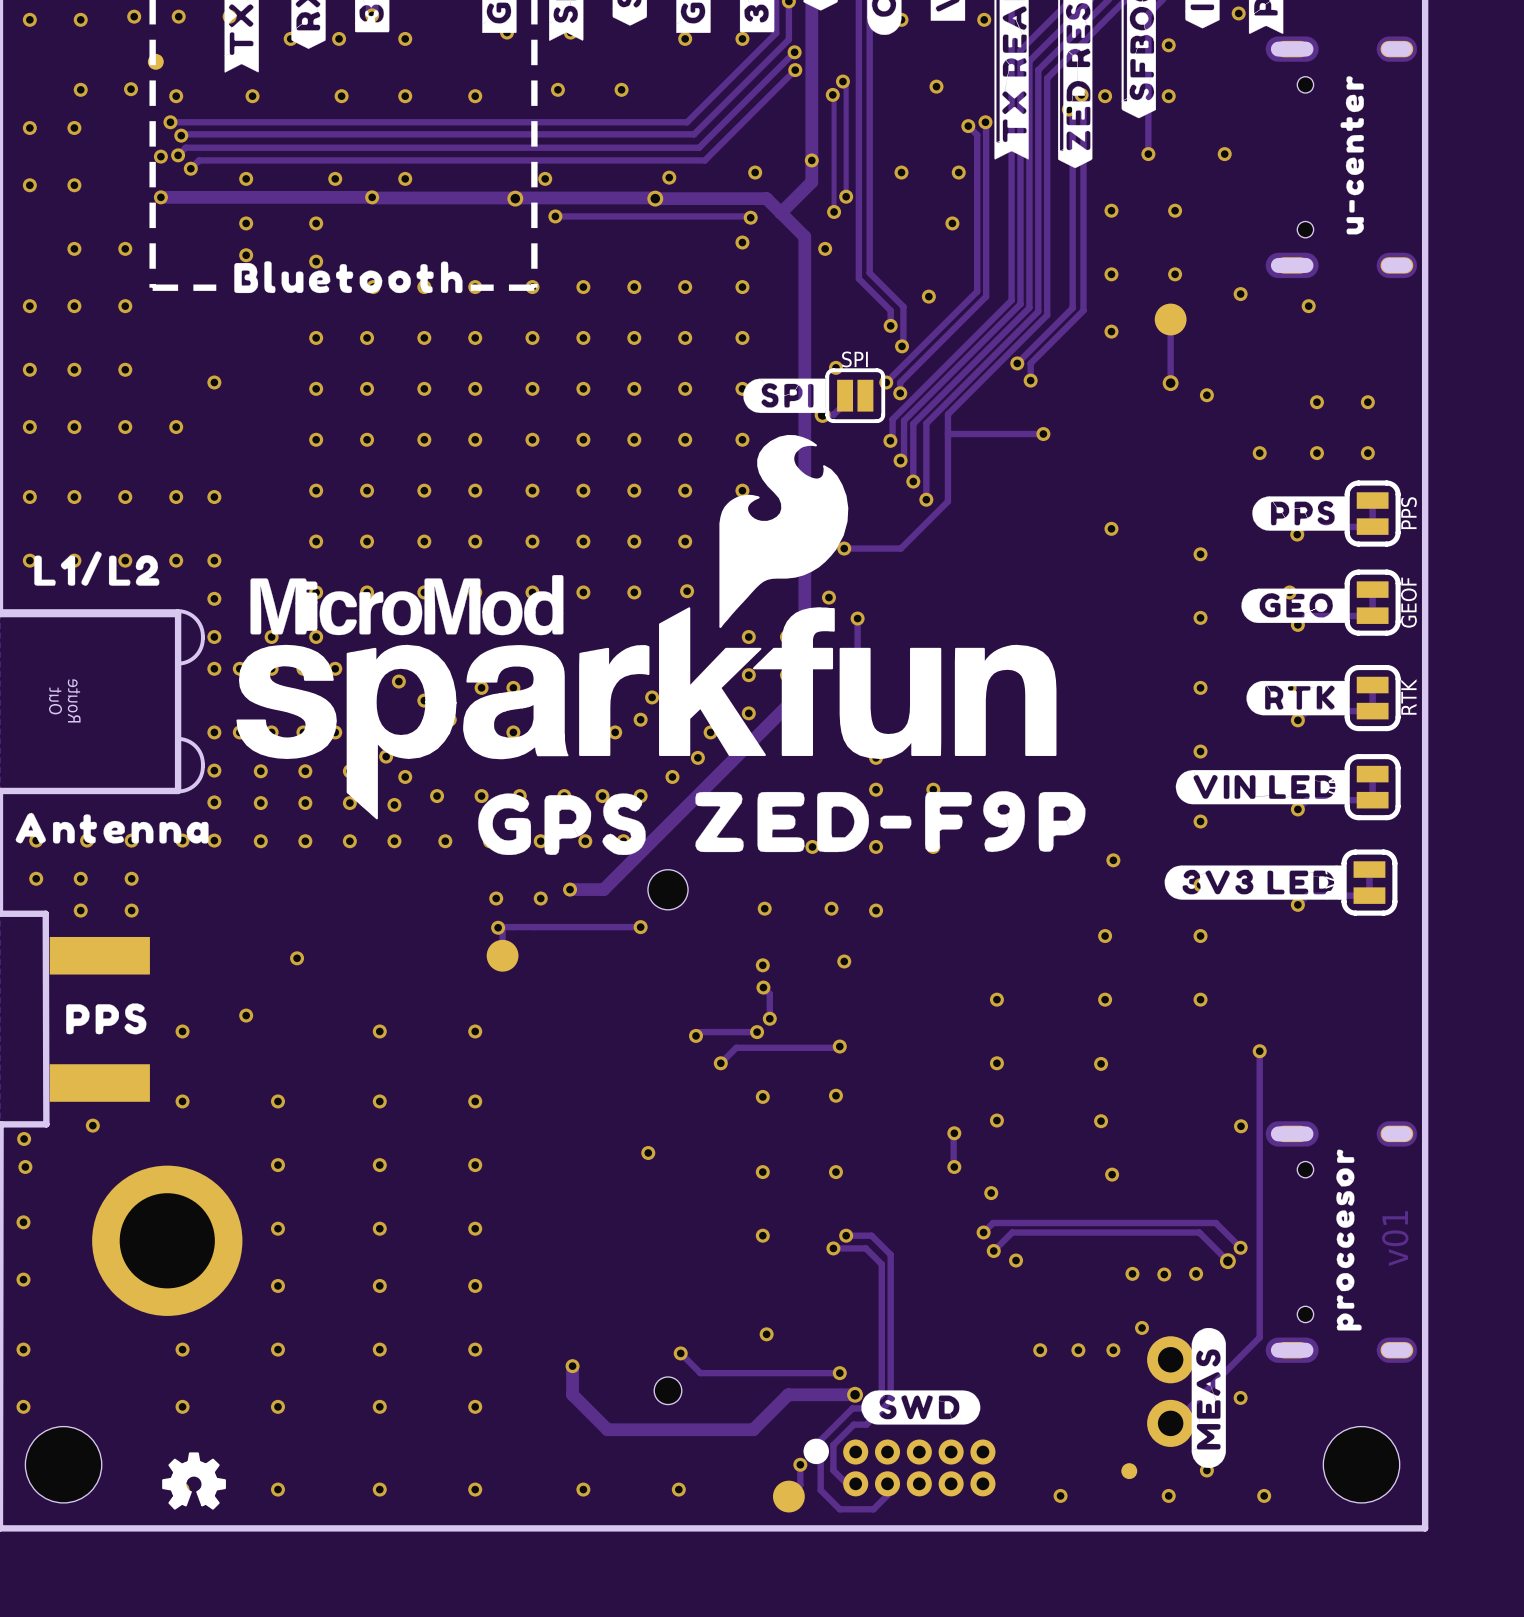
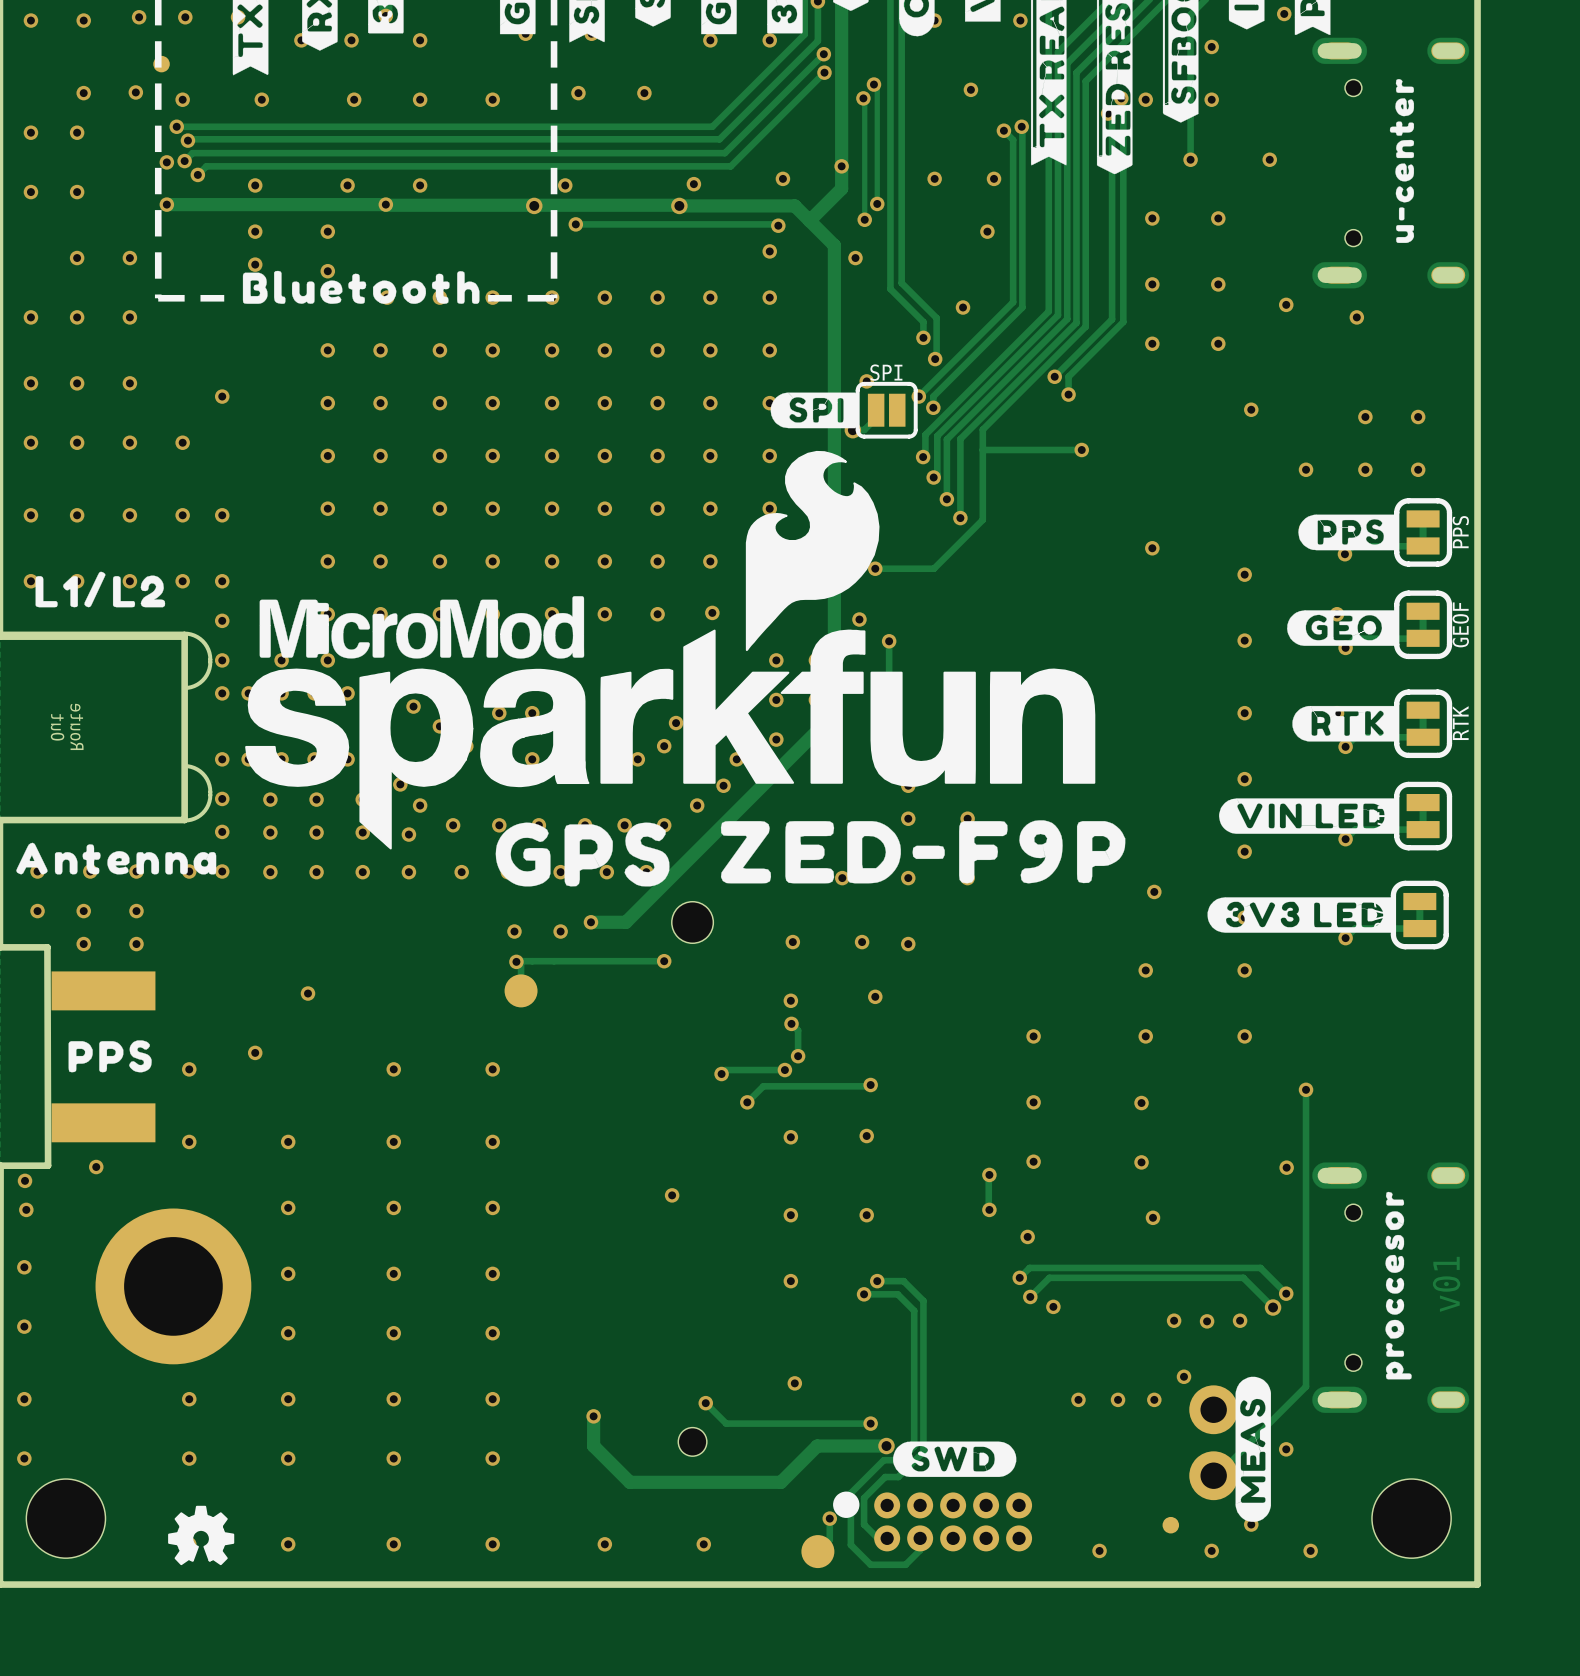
track: (1170, 319) (1170, 383) -> none
part: (1170, 319) -> none
via: none -> (1218, 343)
via: (1170, 383) -> none

